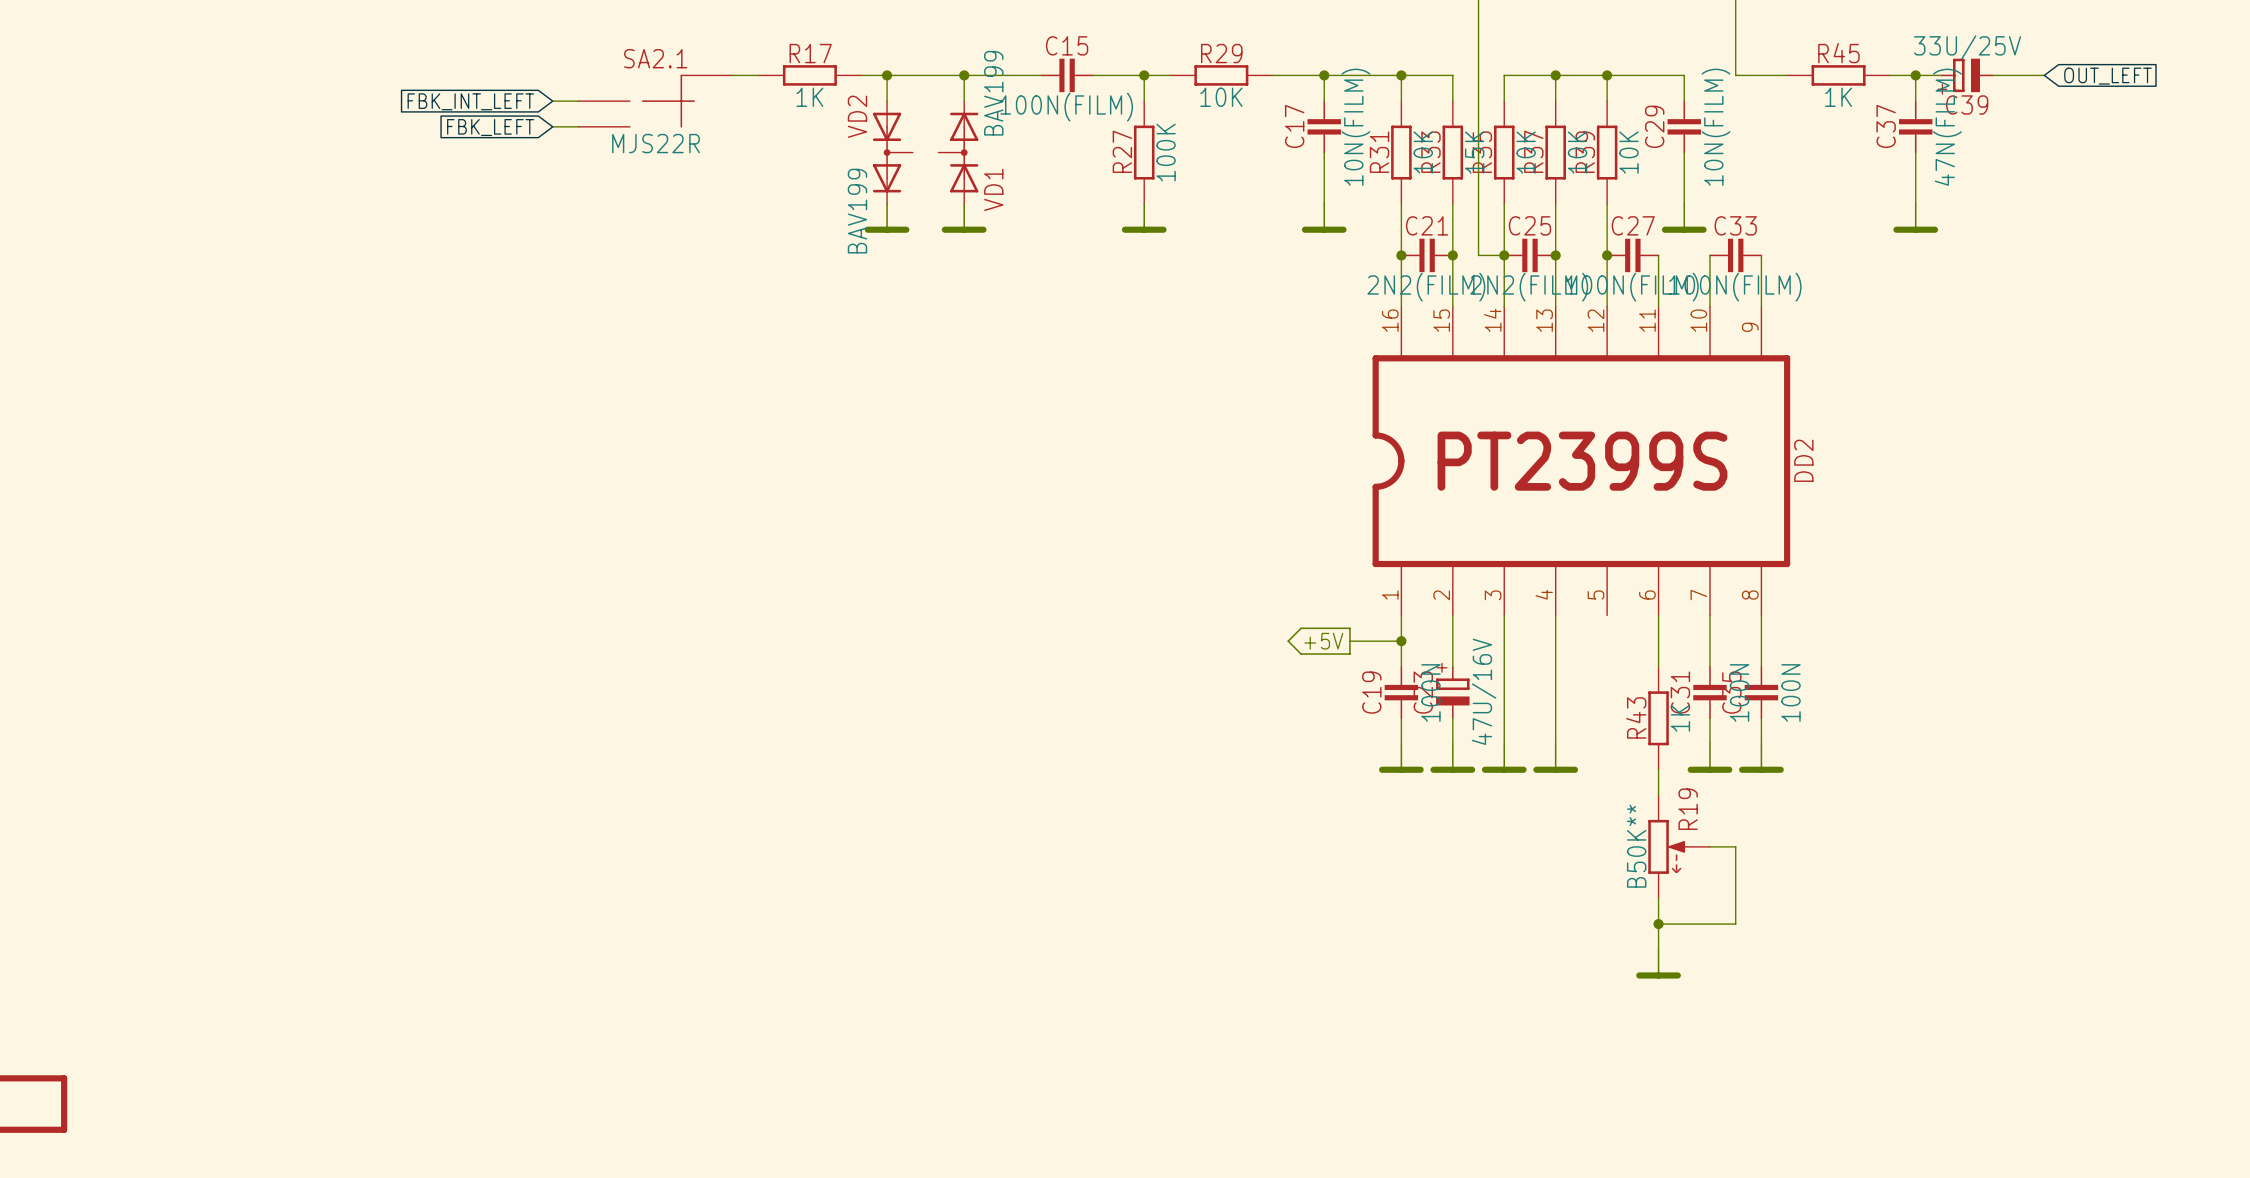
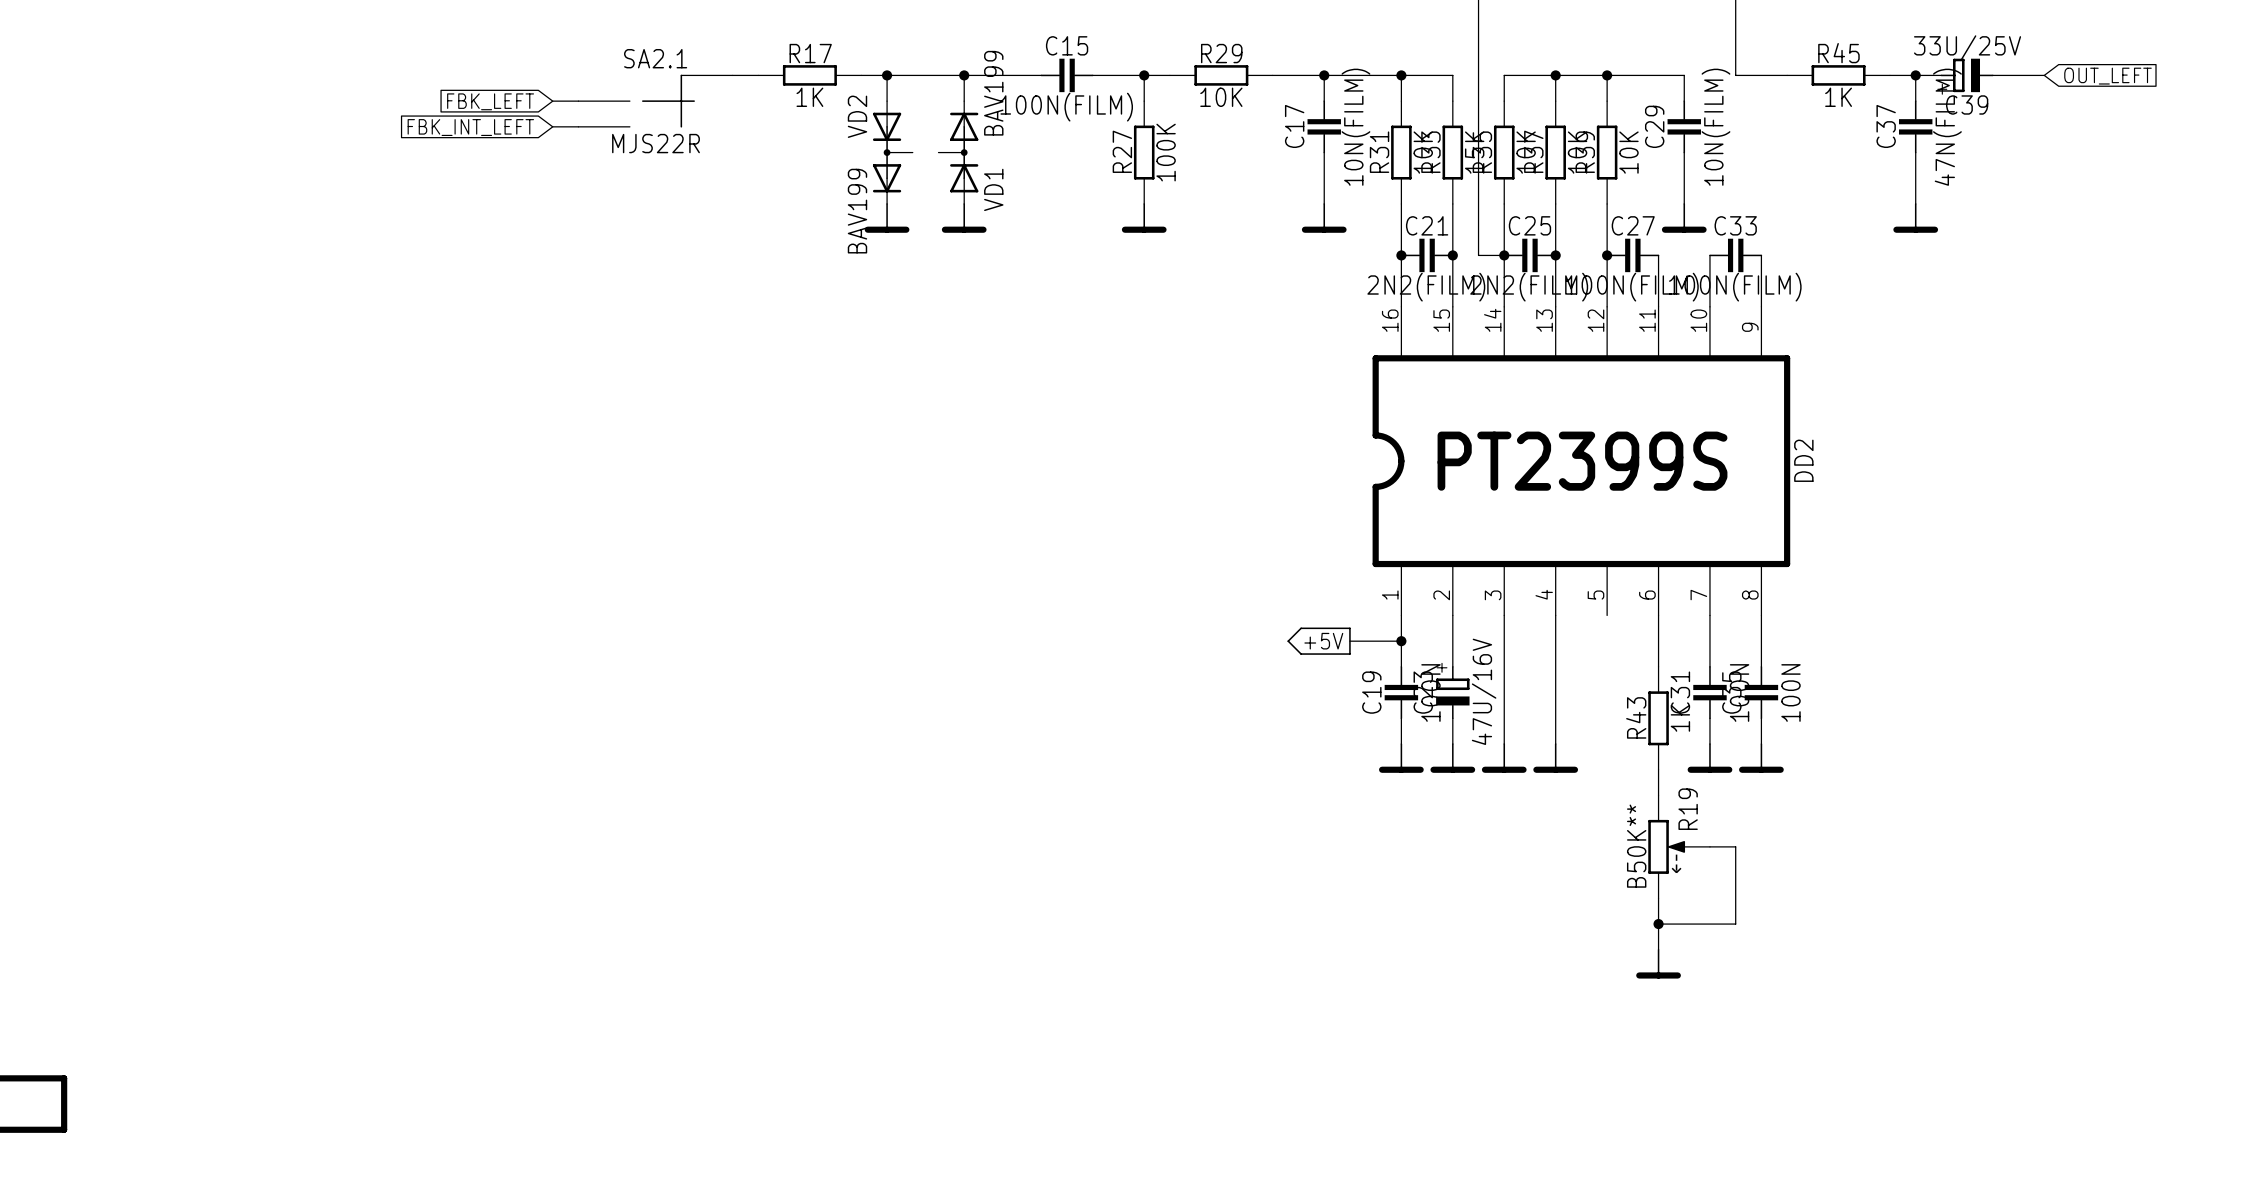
global label: FBK_INT_LEFT (470, 101) -> FBK_LEFT (490, 101)
global label: FBK_LEFT (490, 127) -> FBK_INT_LEFT (470, 127)

